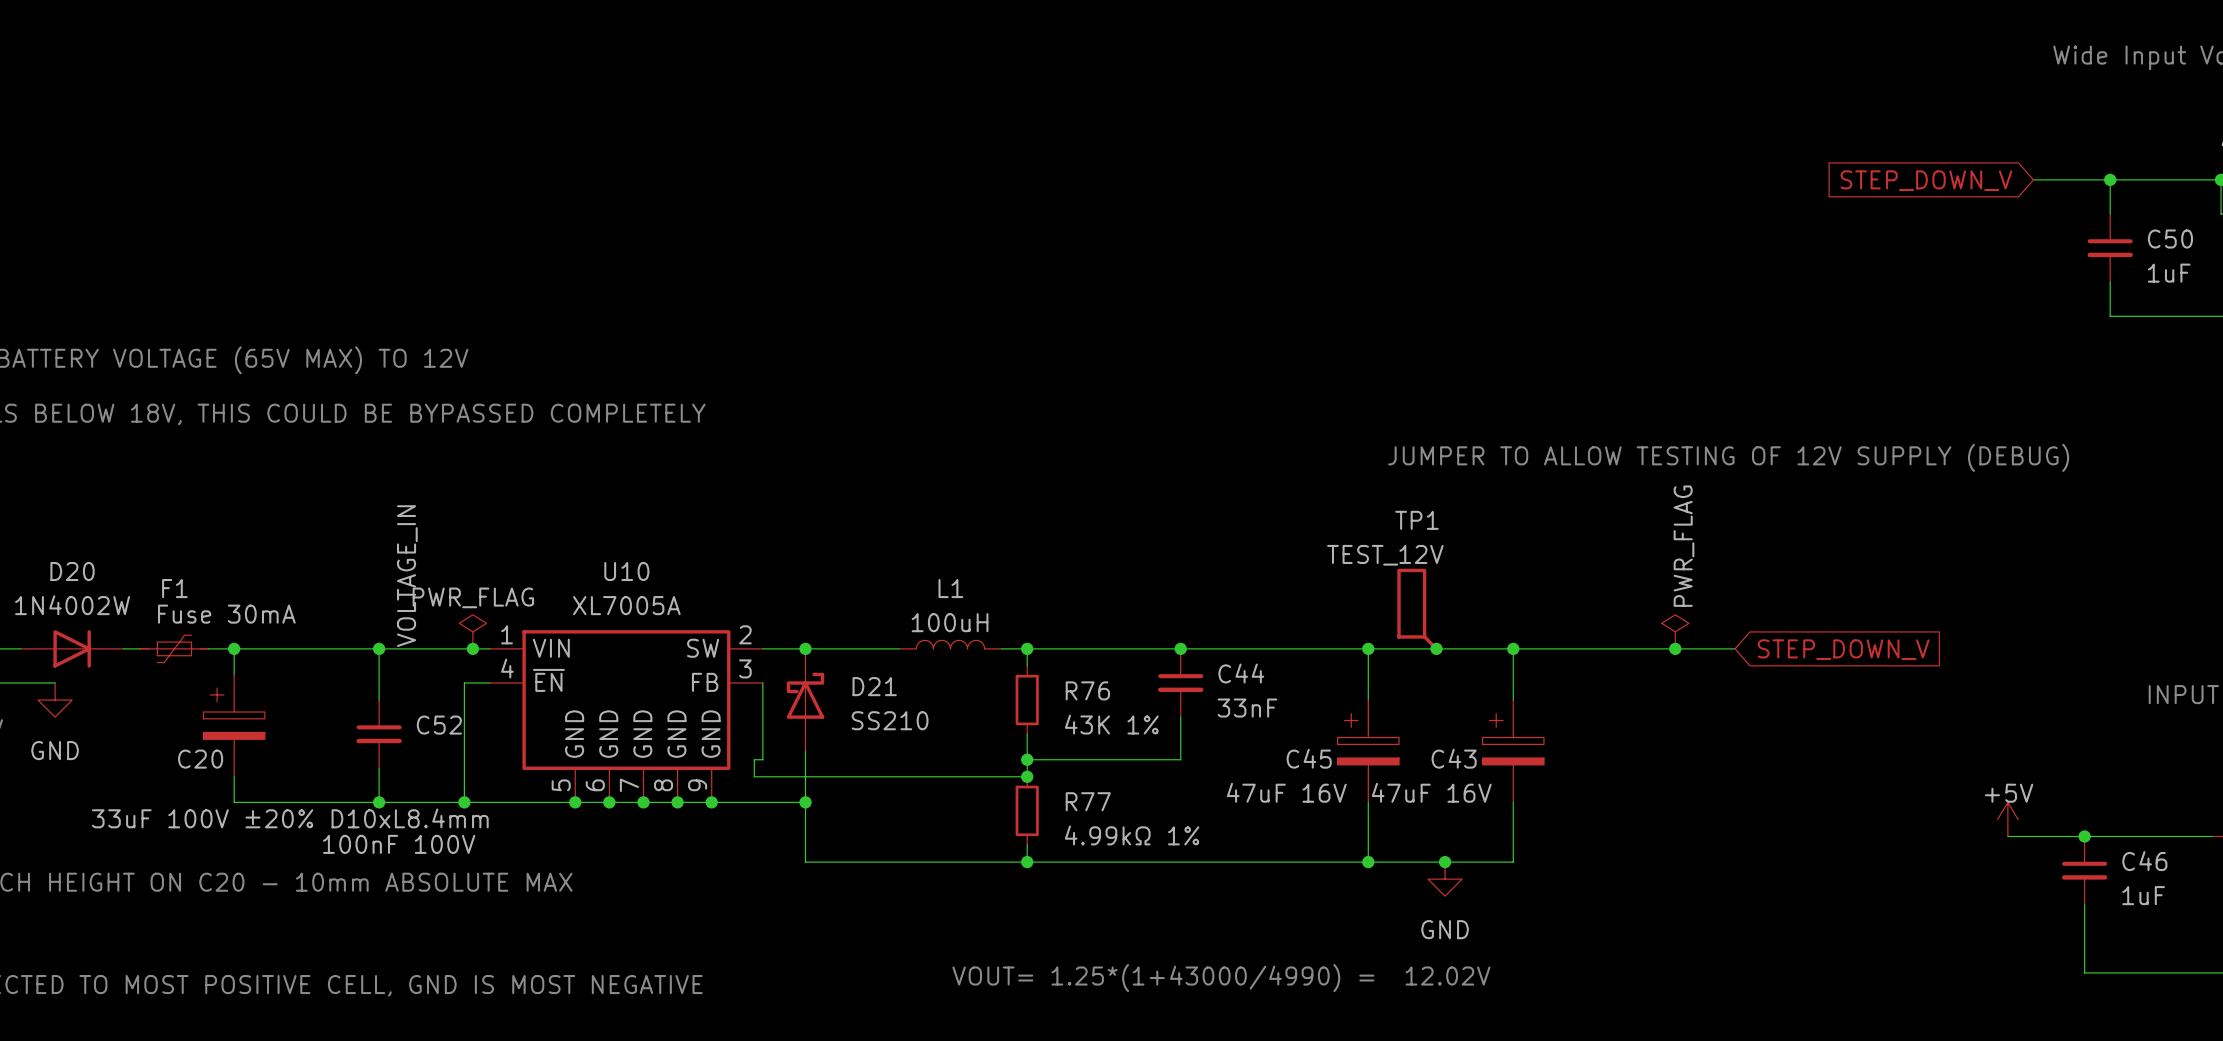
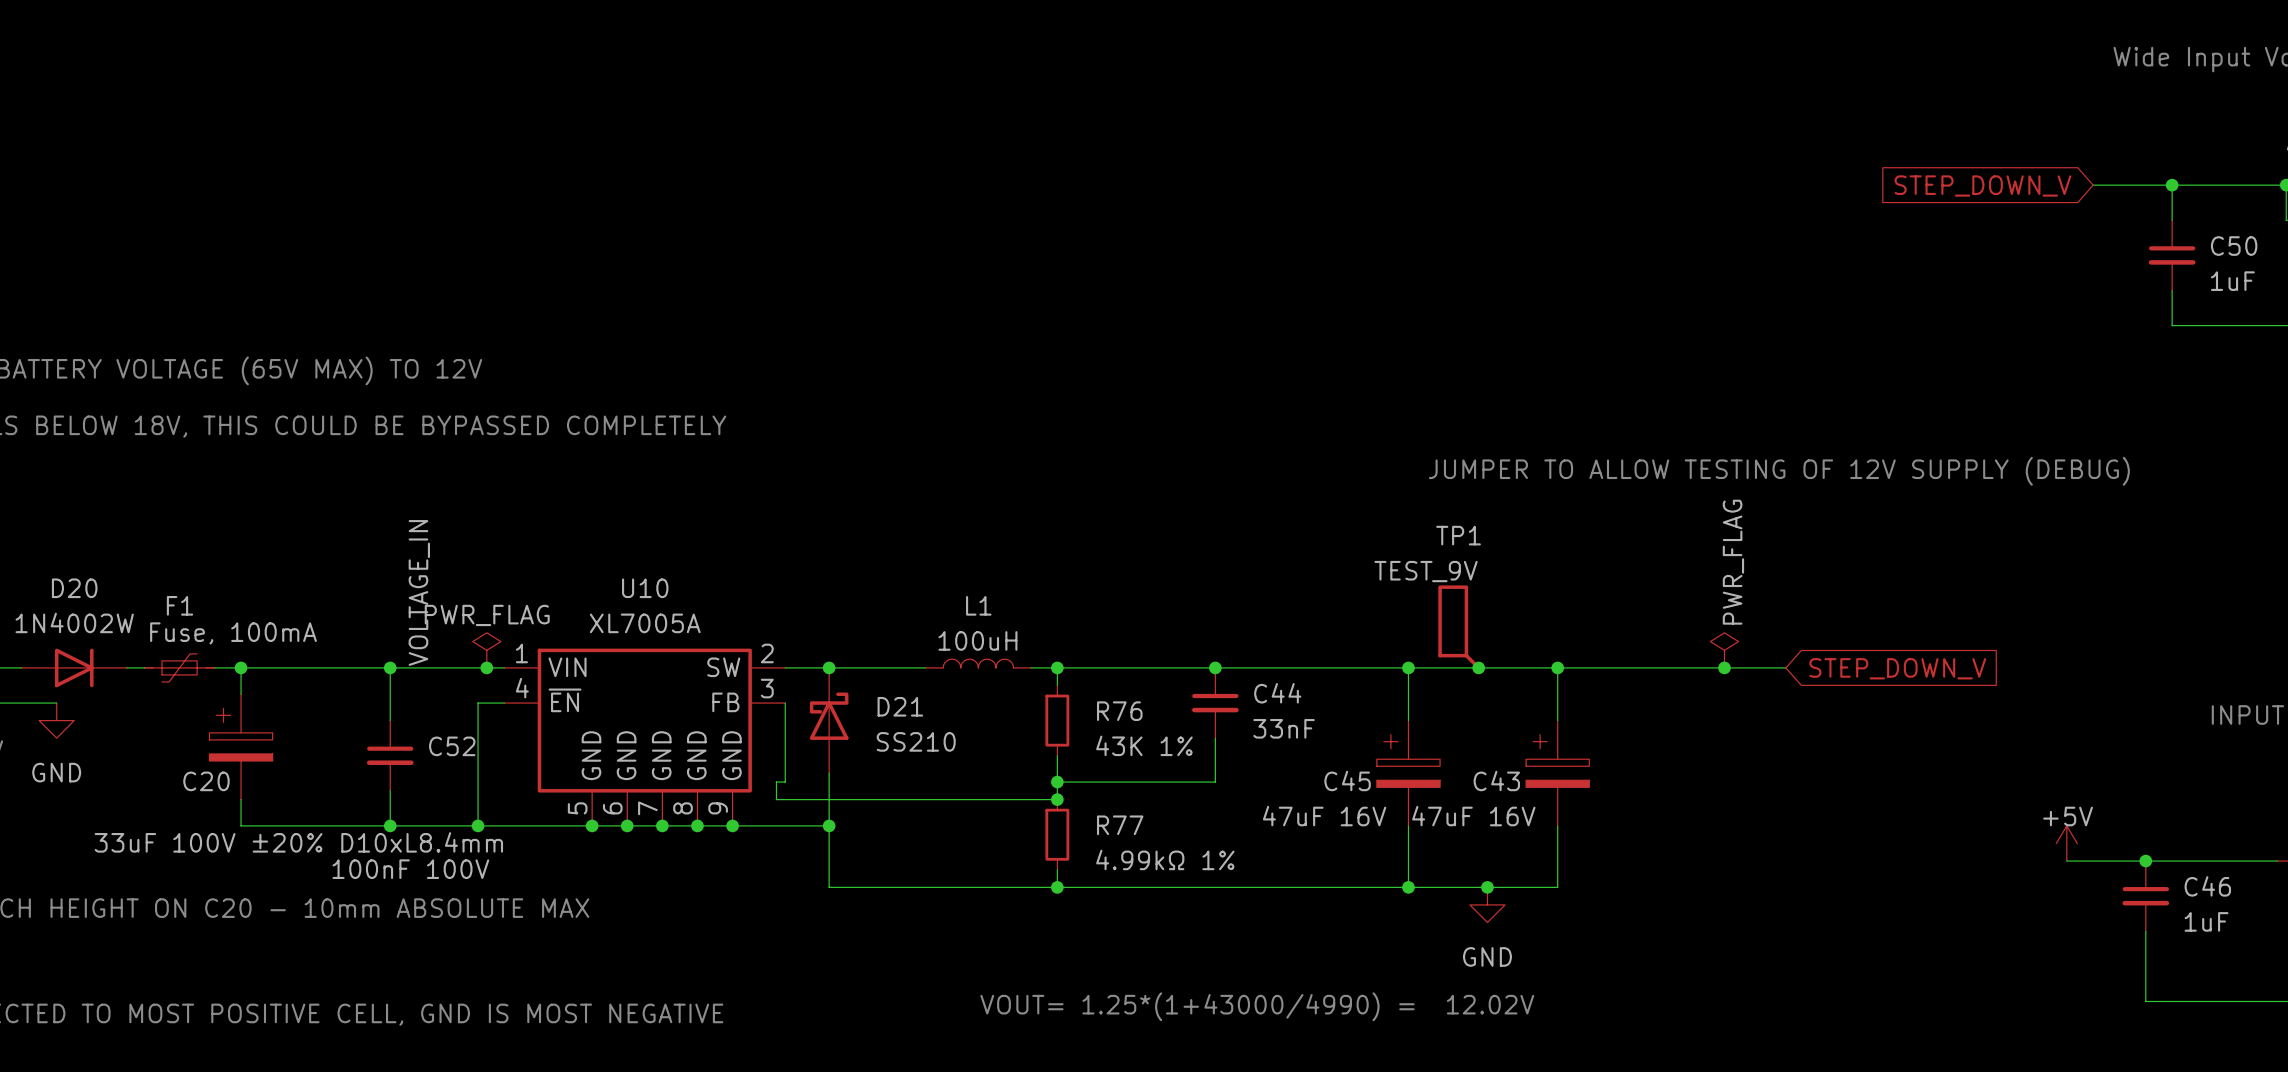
TP1 value: TEST_12V (1385, 555) -> TEST_9V (1426, 571)
F1 value: Fuse 30mA (226, 614) -> Fuse, 100mA (233, 633)

